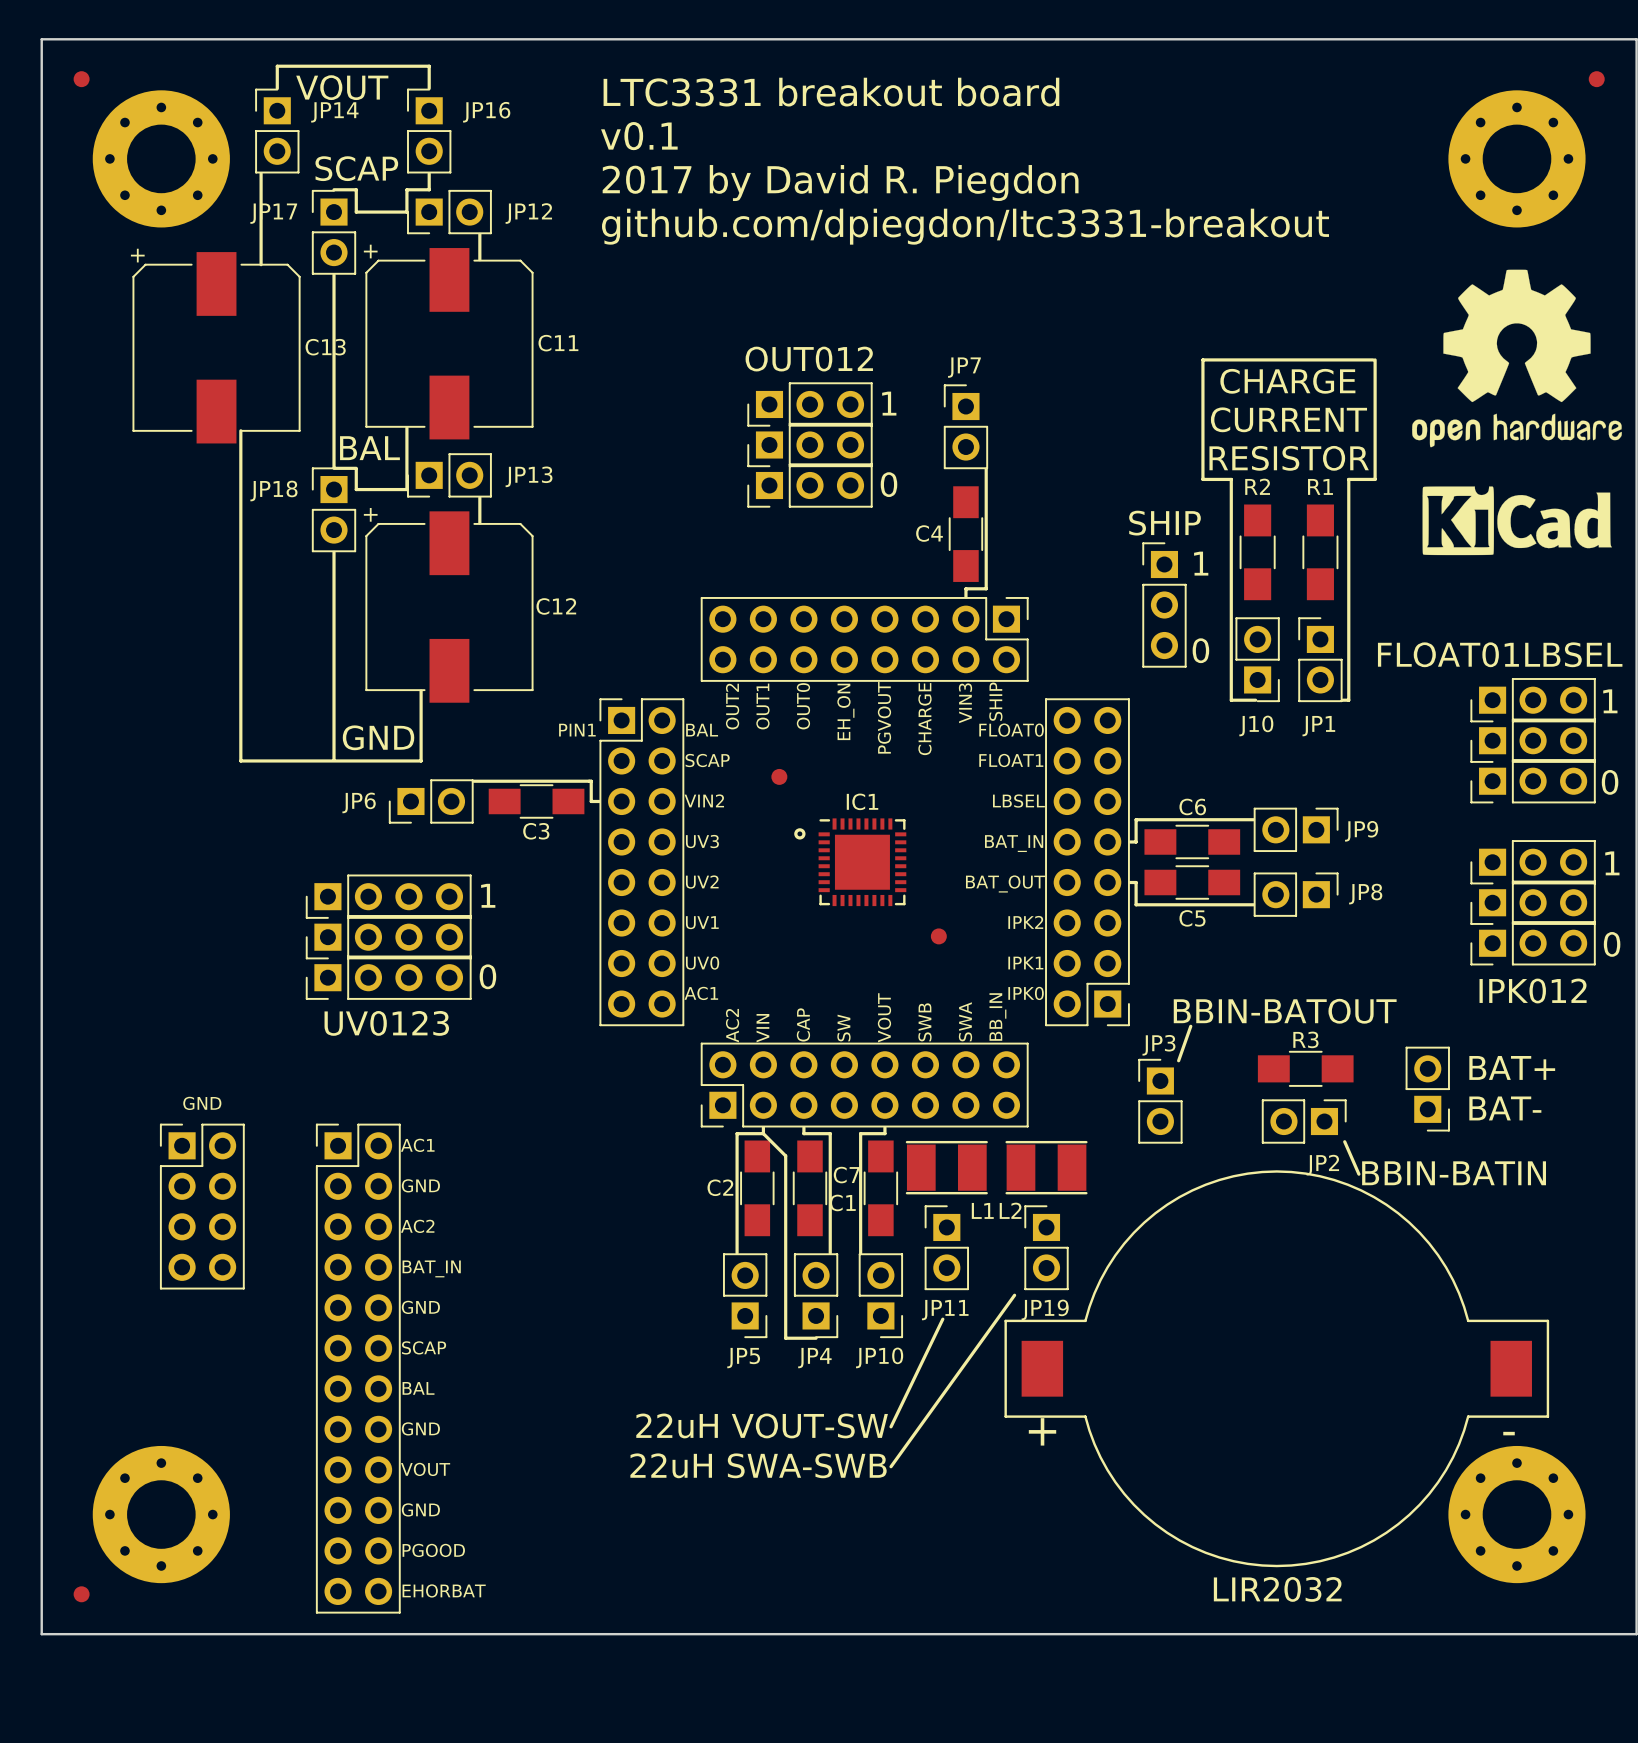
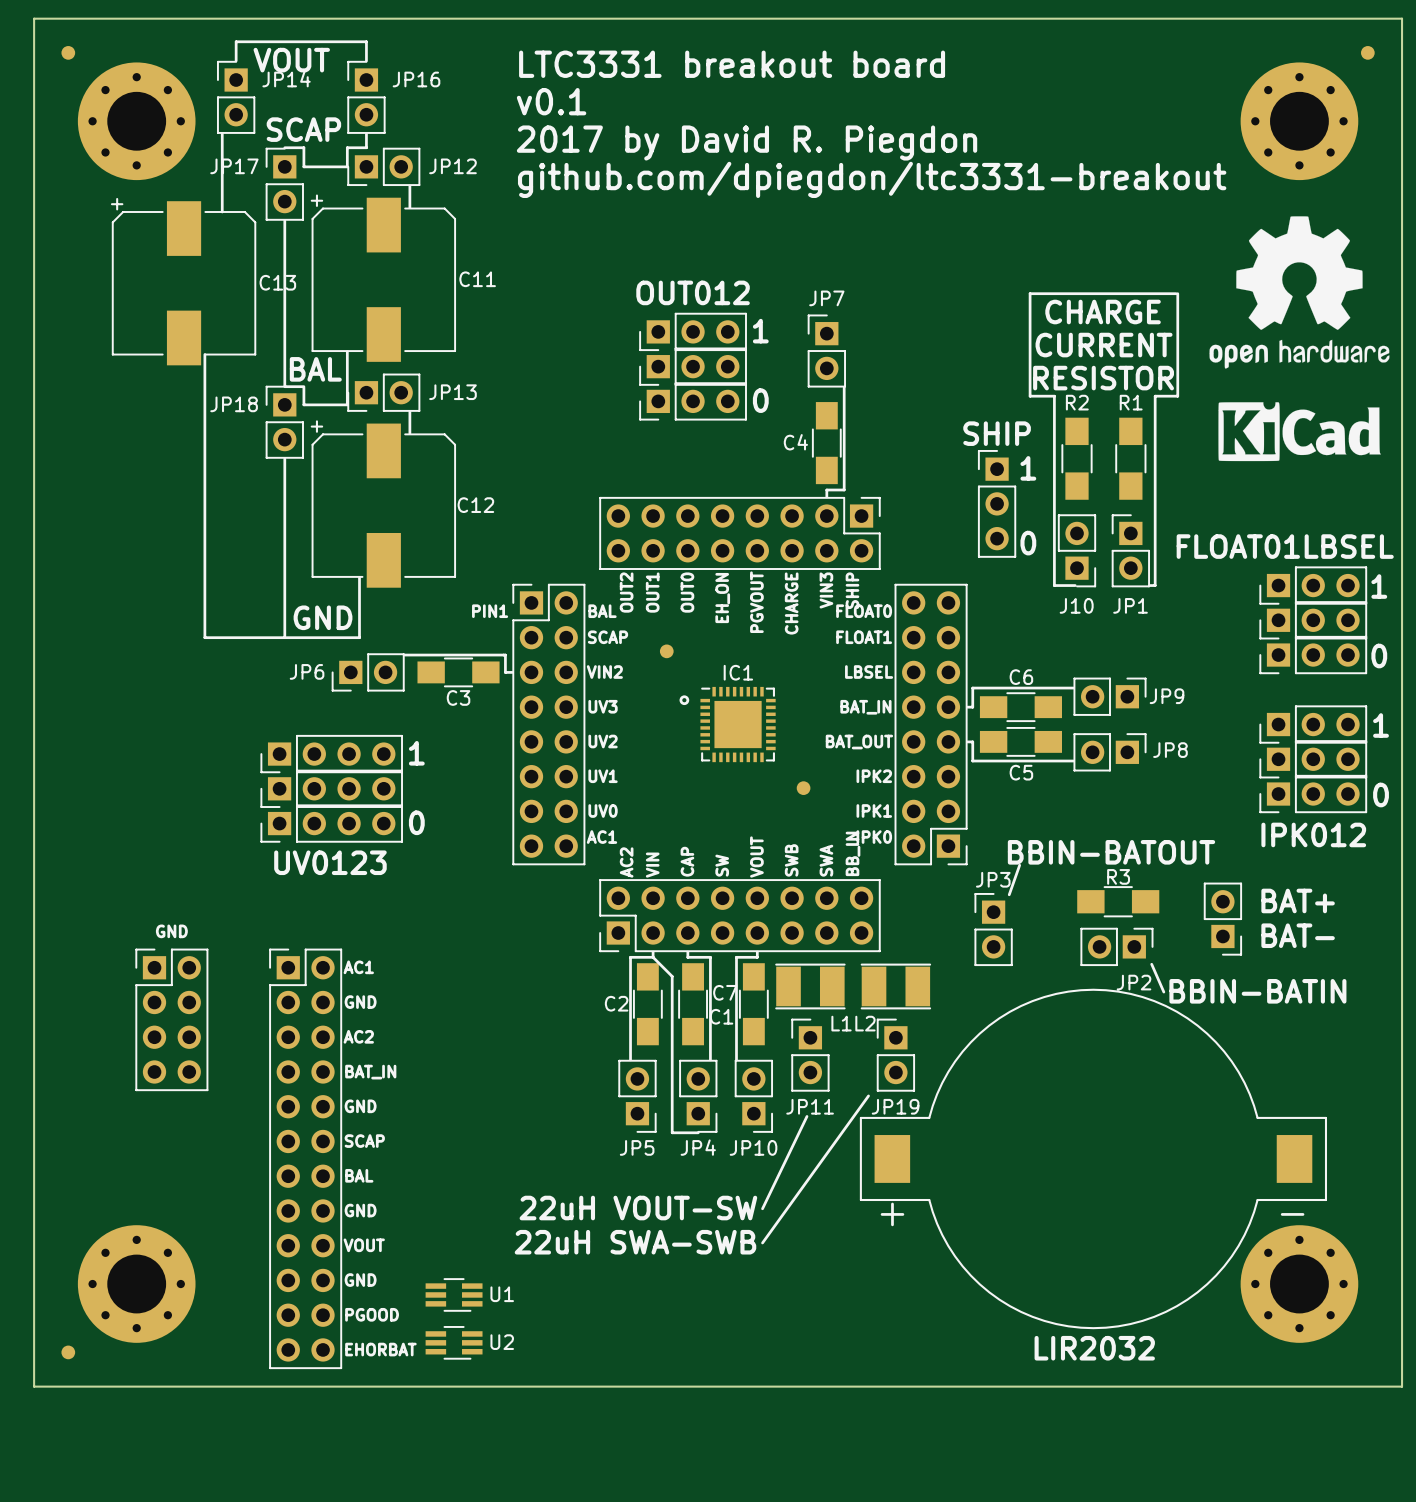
U1: none -> (454, 1294)
U2: none -> (454, 1342)

